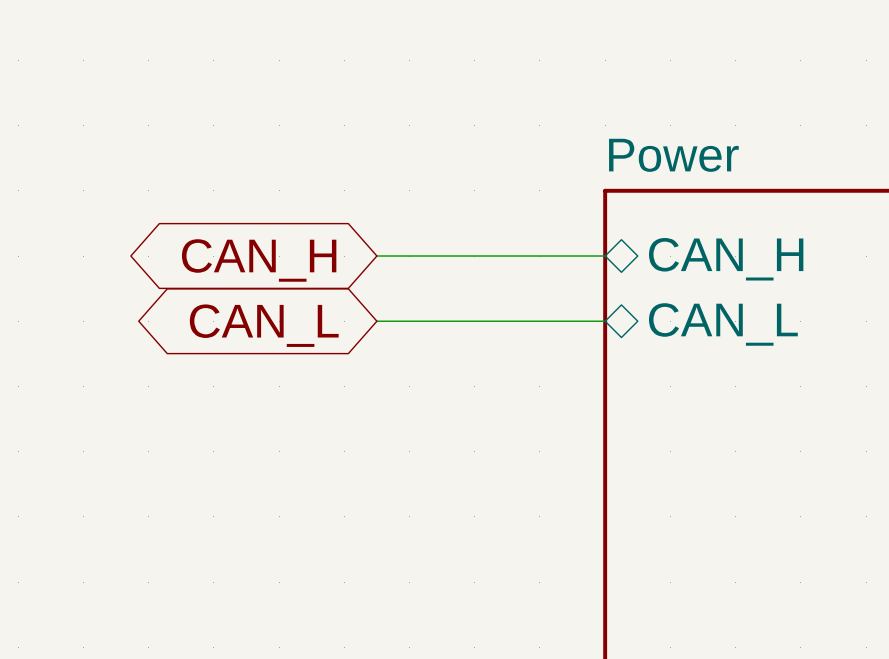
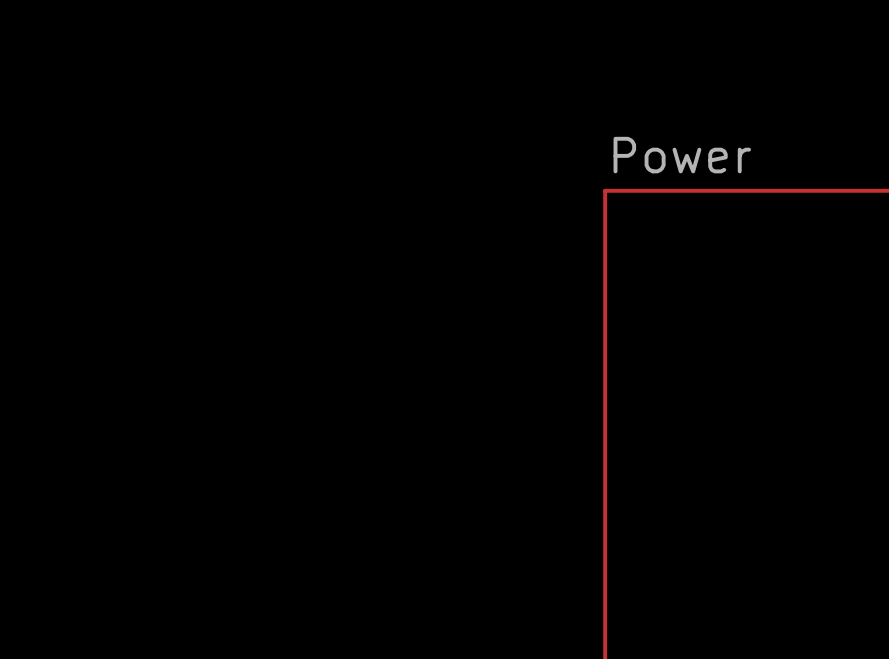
wire: (376, 256) (605, 256) -> none
sheet pin: CAN_H (726, 259) -> none
global label: CAN_H (259, 260) -> none
wire: (376, 321) (605, 321) -> none
sheet pin: CAN_L (723, 324) -> none
global label: CAN_L (264, 325) -> none

